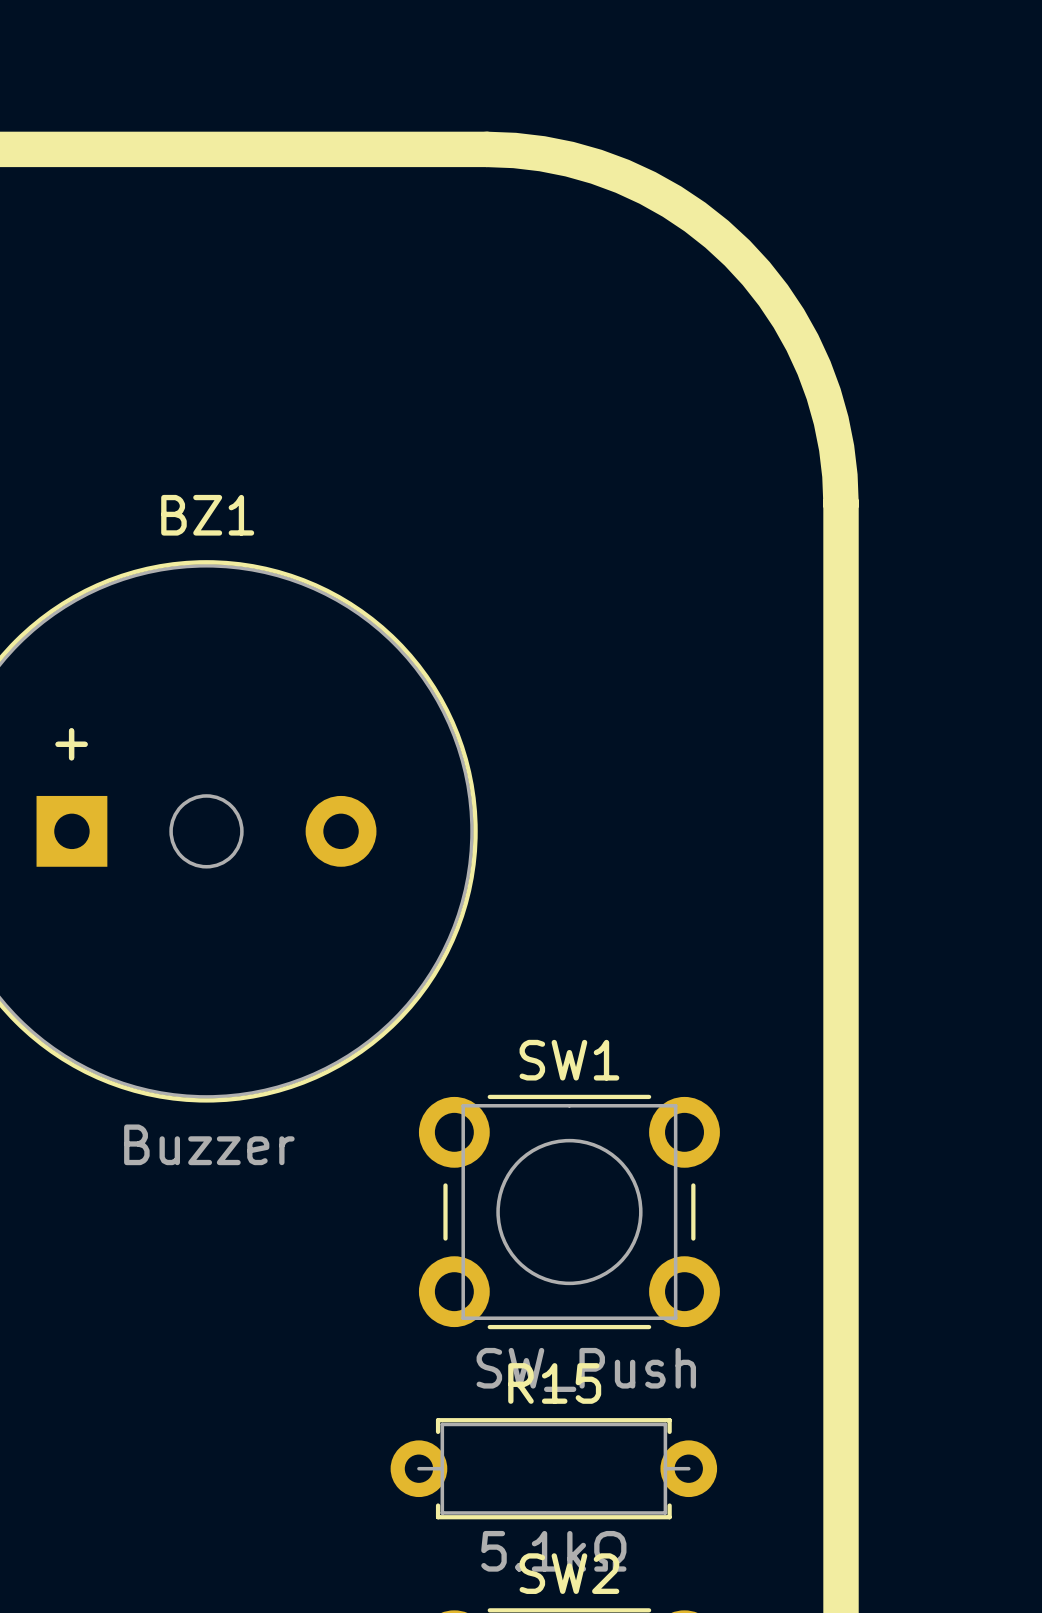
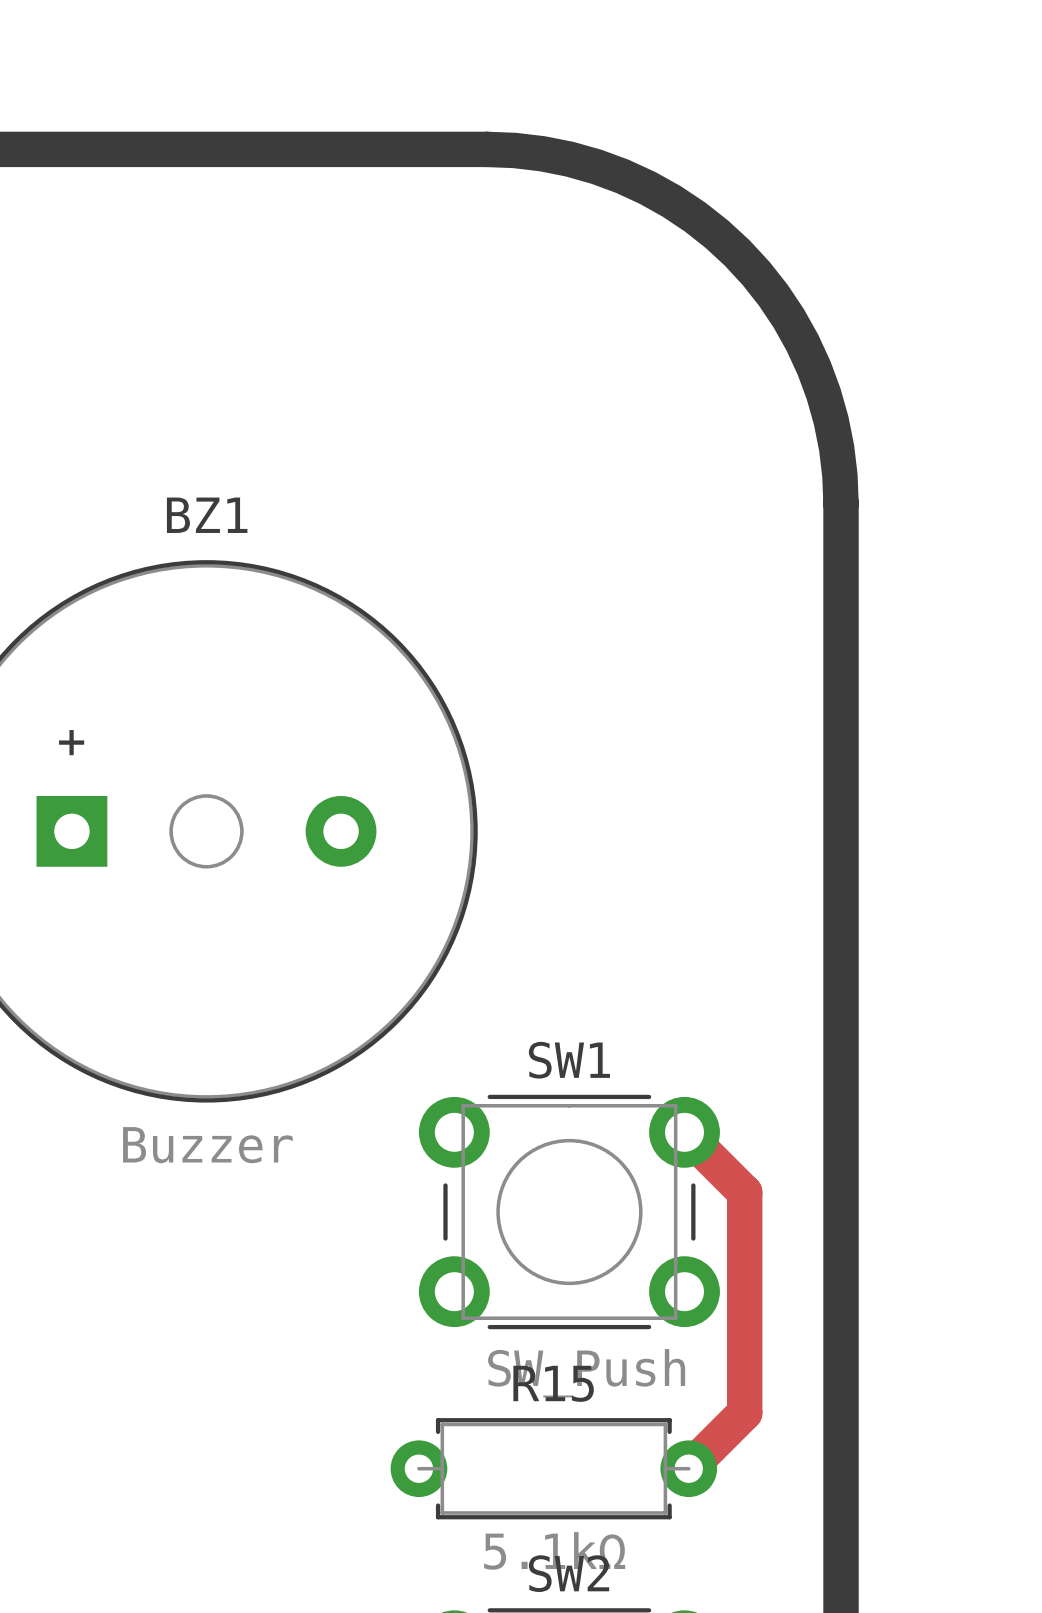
top track: none -> (684, 1132) (744, 1192) (744, 1412) (688, 1468)

